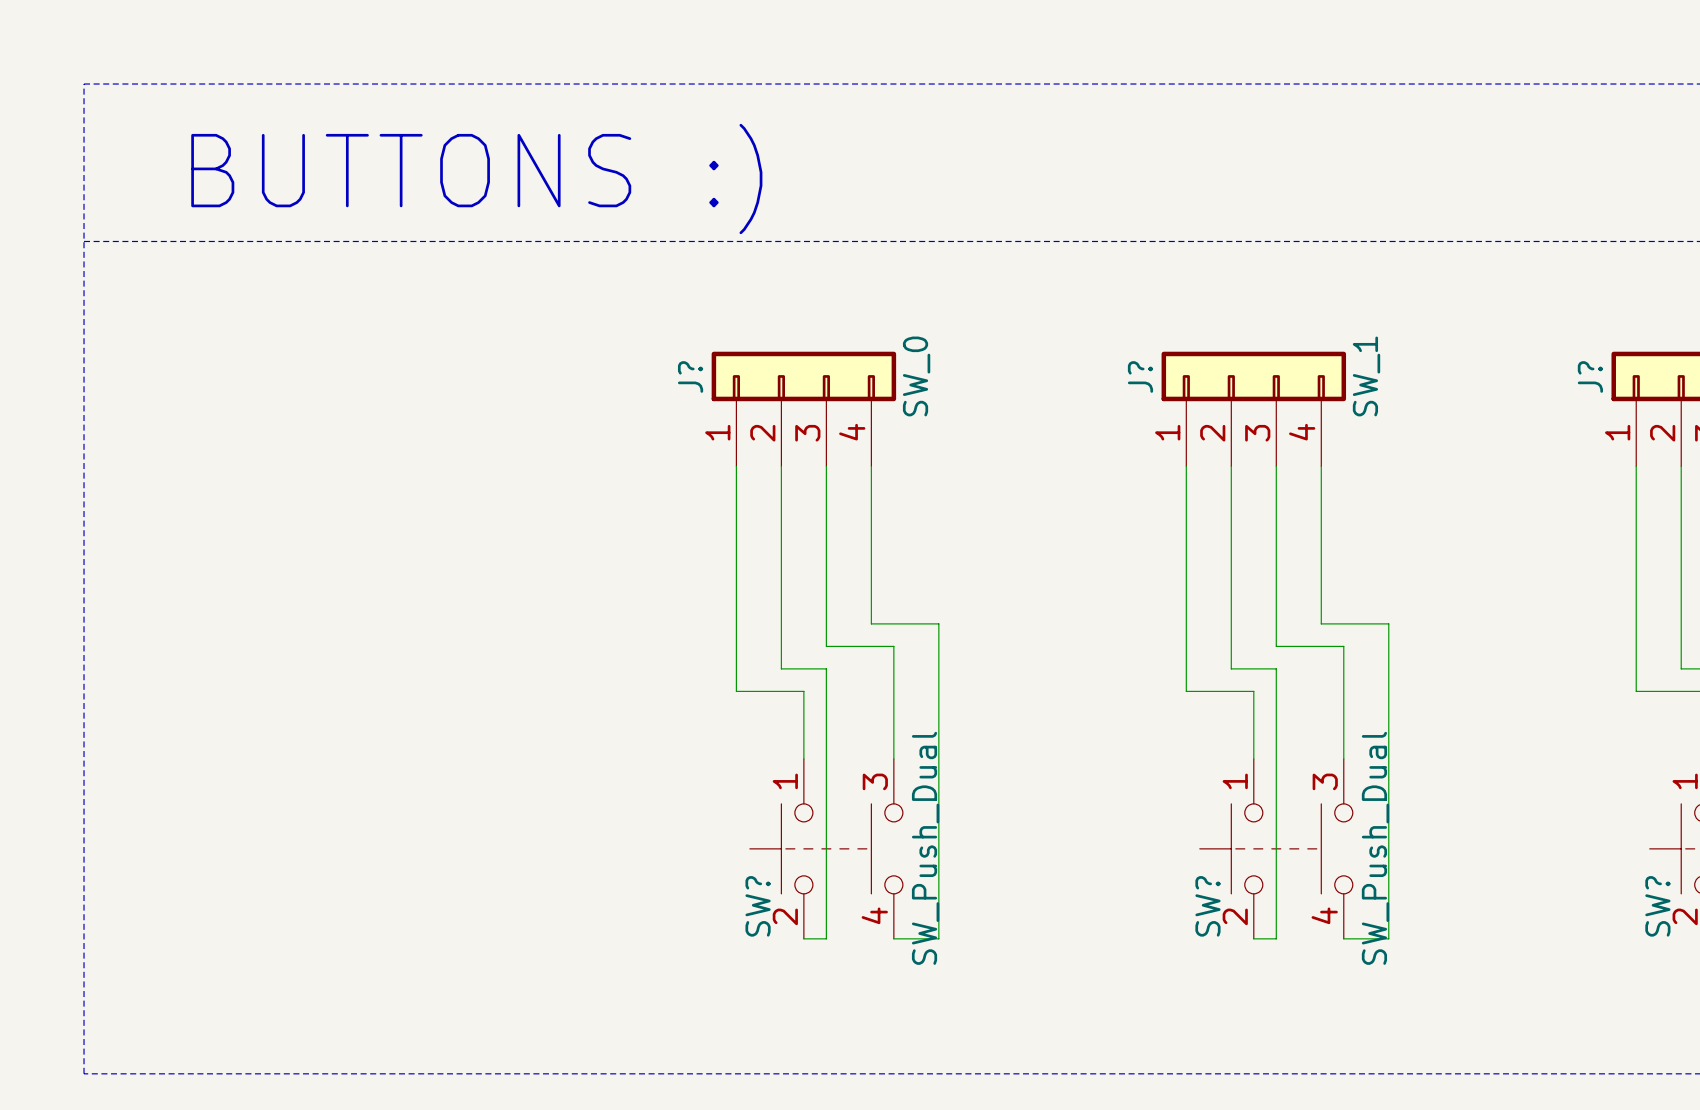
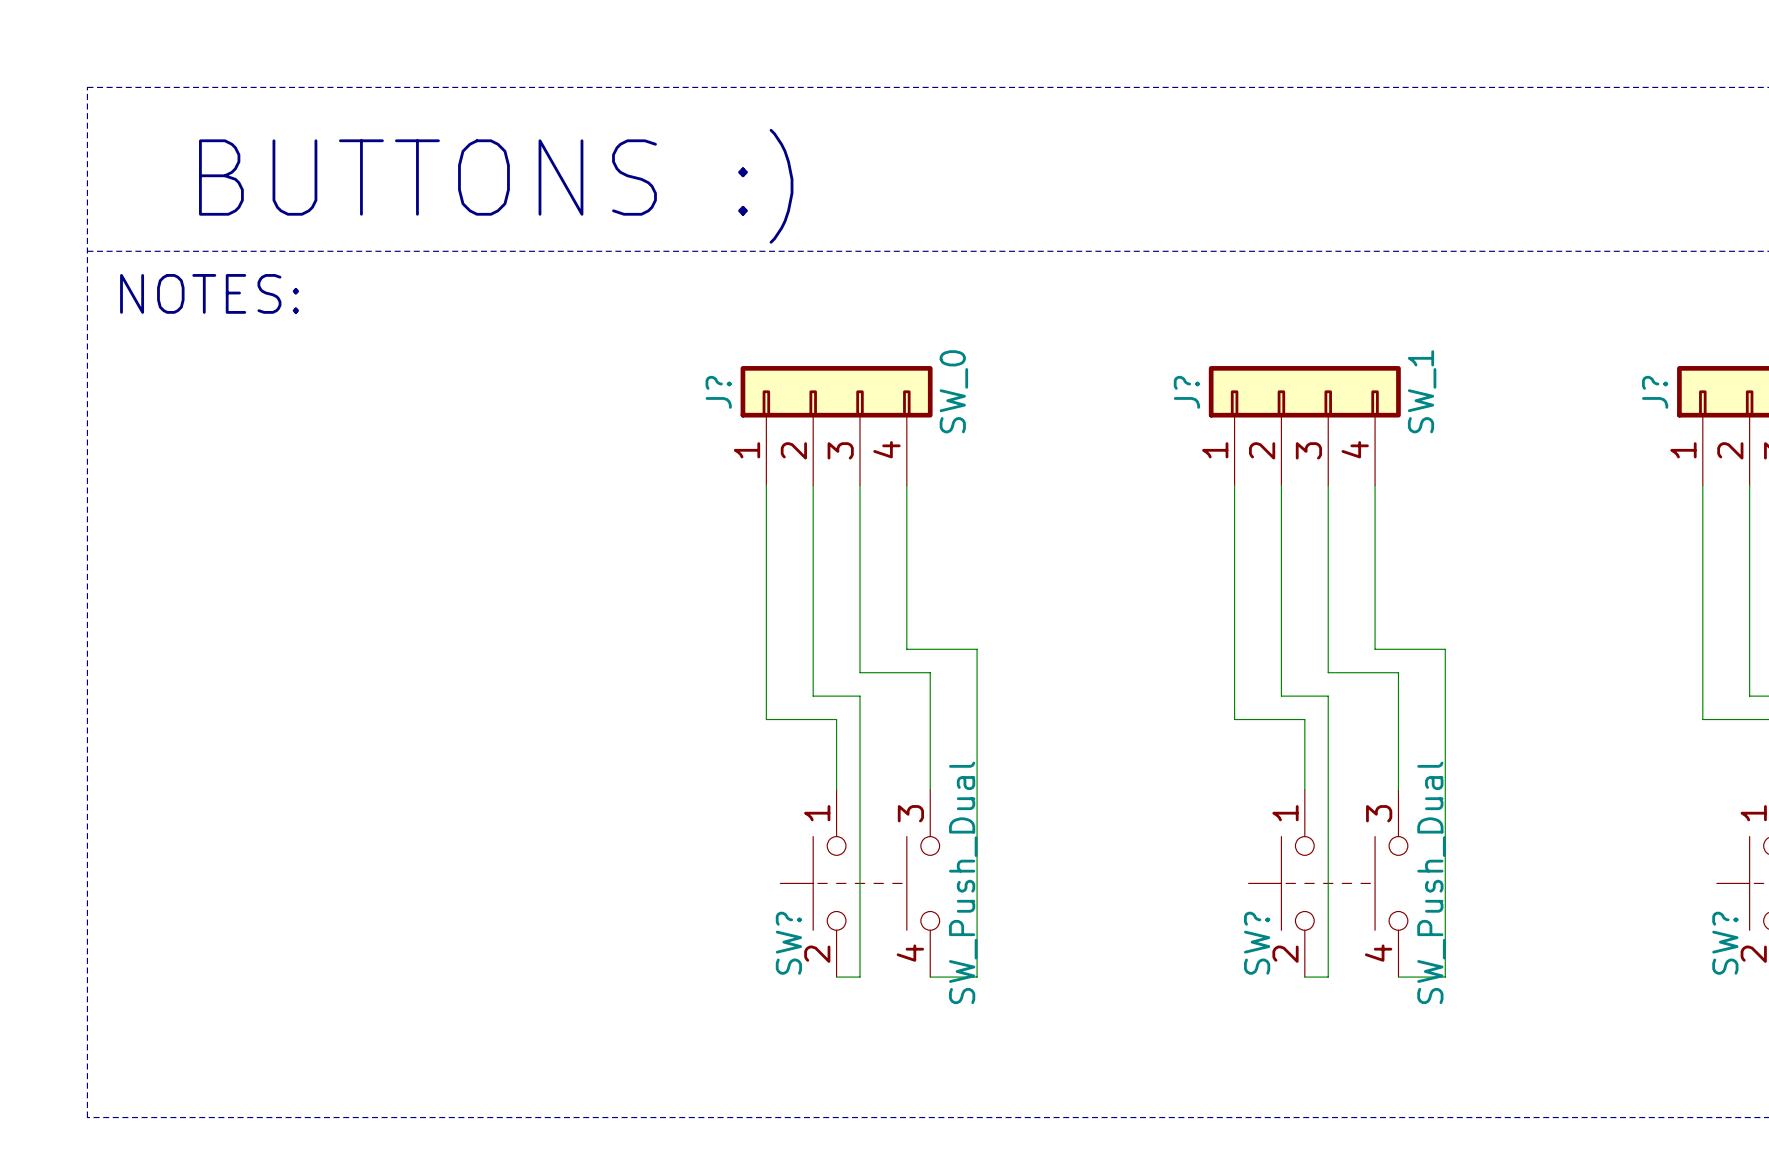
text: none -> NOTES: (209, 293)

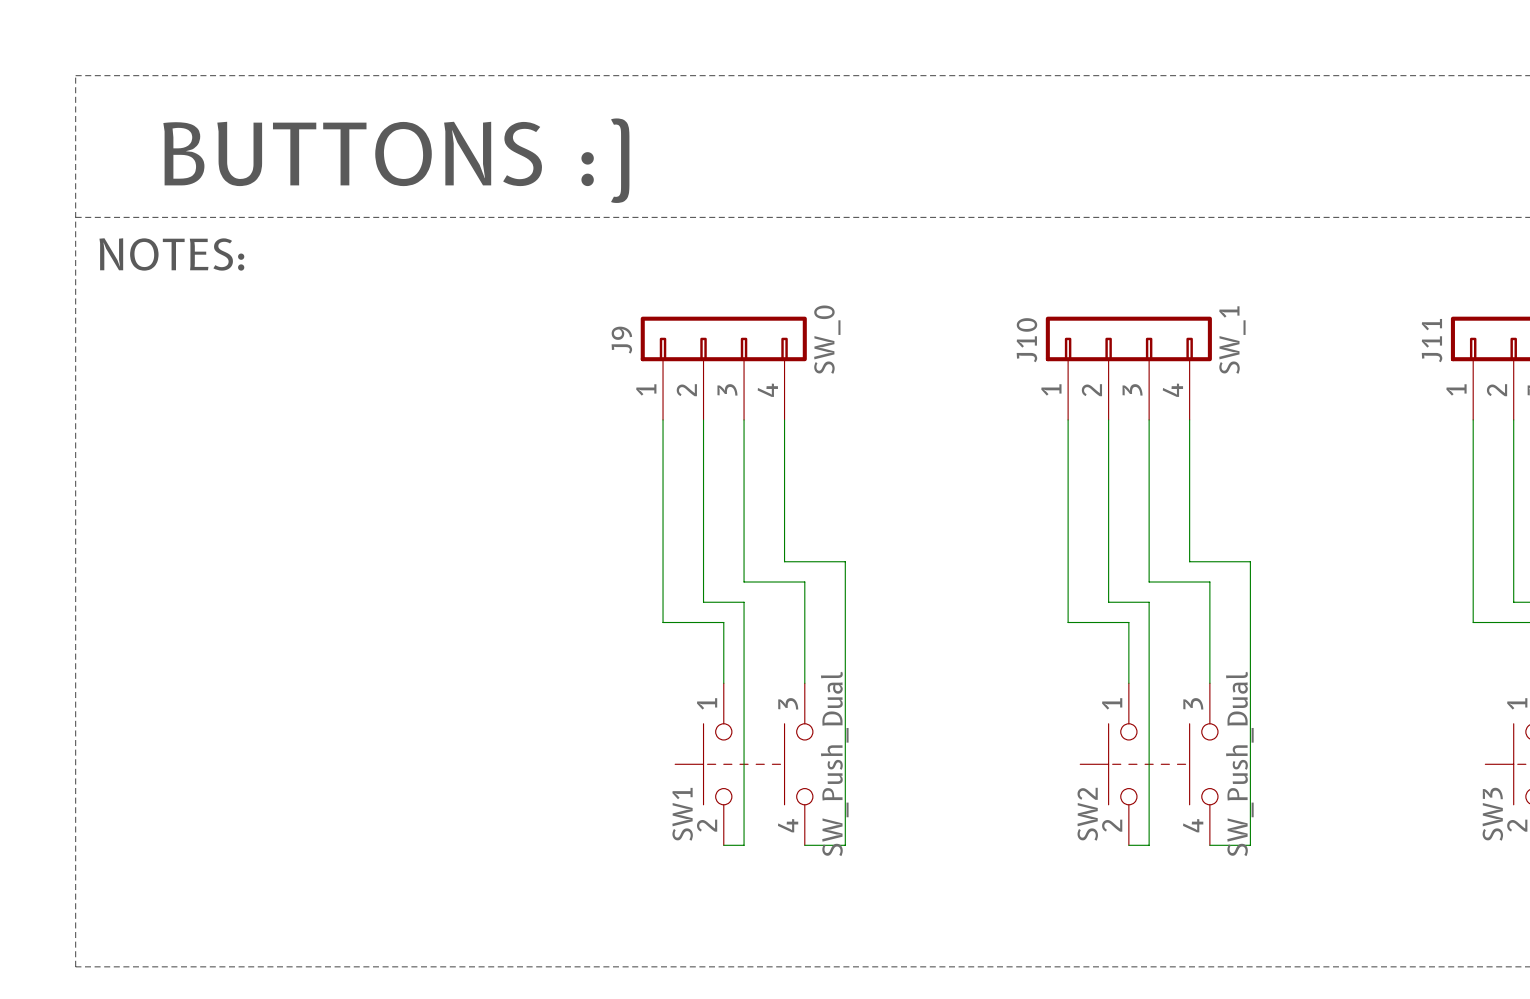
J? name: J? (718, 392) -> J9 (621, 340)
J? name: J? (1186, 392) -> J10 (1026, 340)
J? name: J? (1655, 392) -> J11 (1432, 340)
SW? name: SW? (788, 943) -> SW1 (682, 814)
SW? name: SW? (1257, 943) -> SW2 (1087, 814)
SW? name: SW? (1725, 943) -> SW3 (1492, 814)

